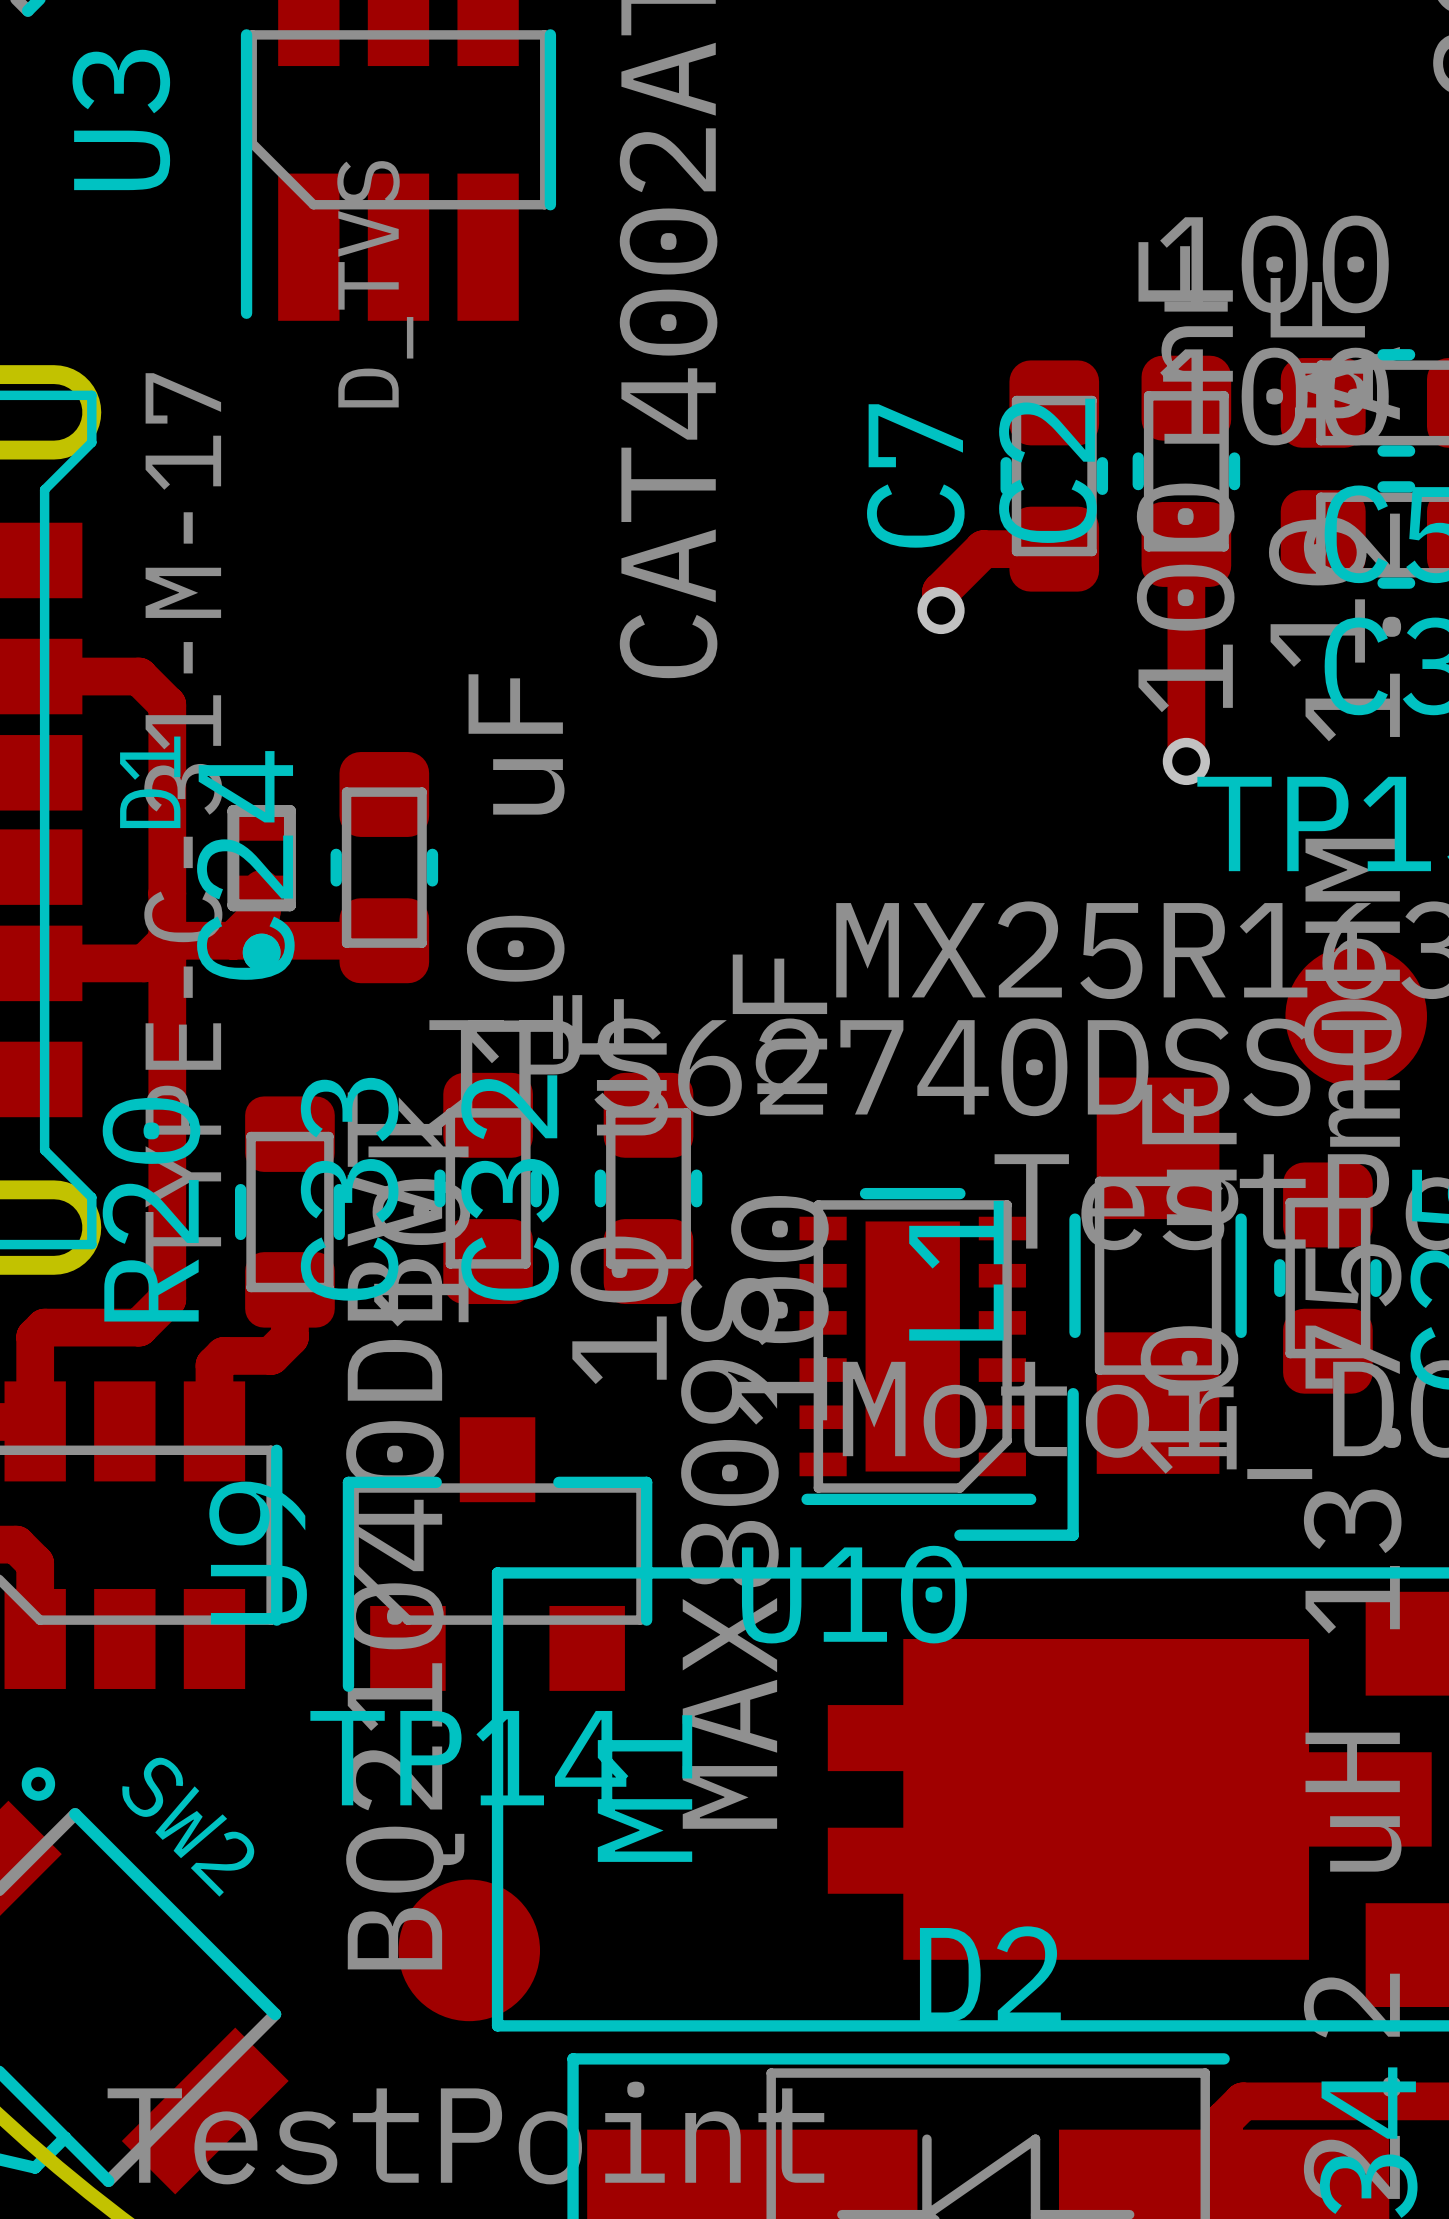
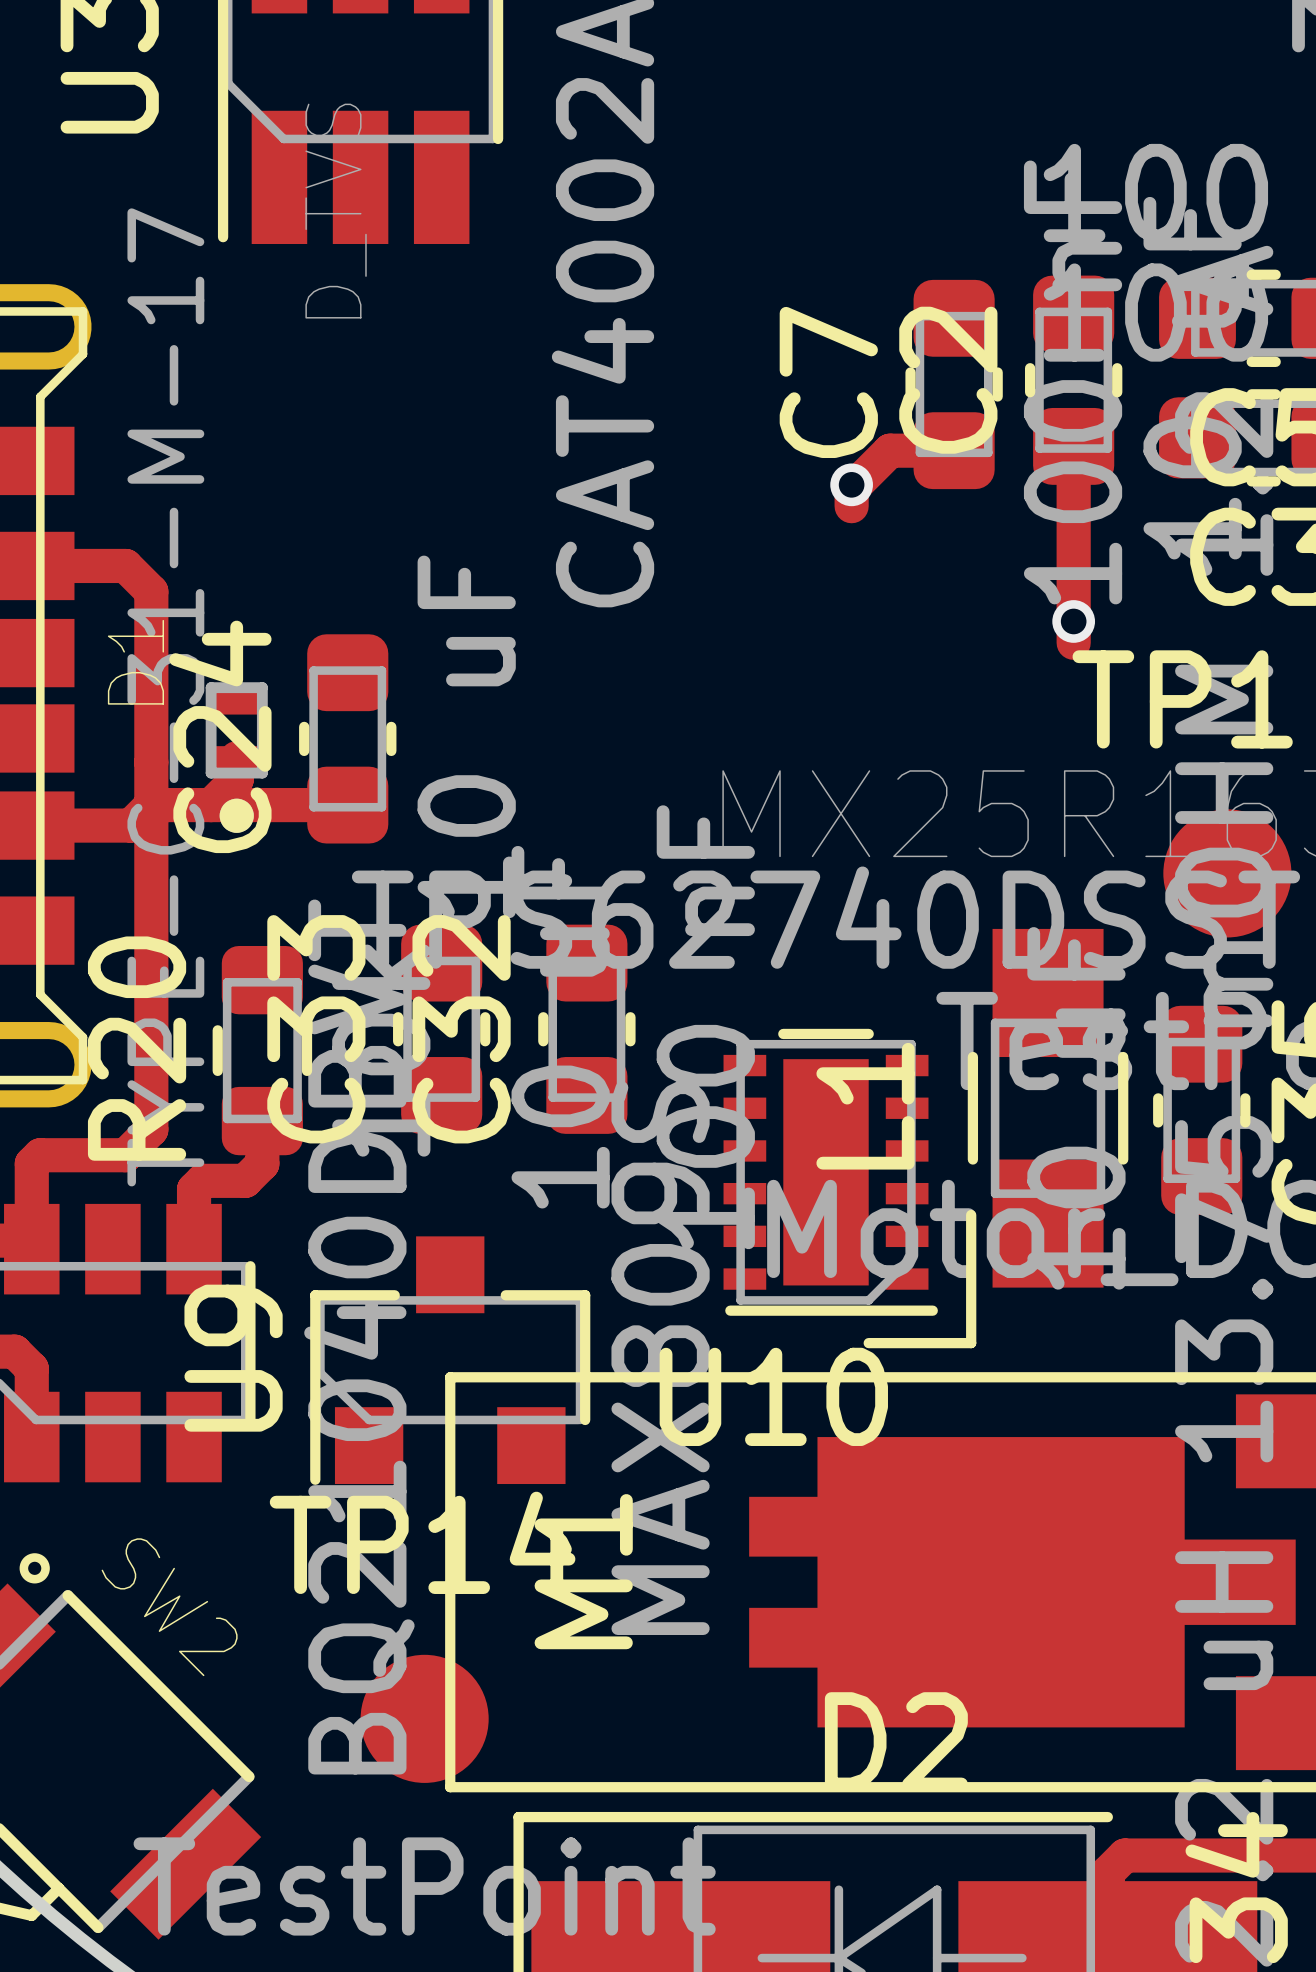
via position: (941, 610) -> (851, 484)
via position: (1186, 761) -> (1073, 621)

